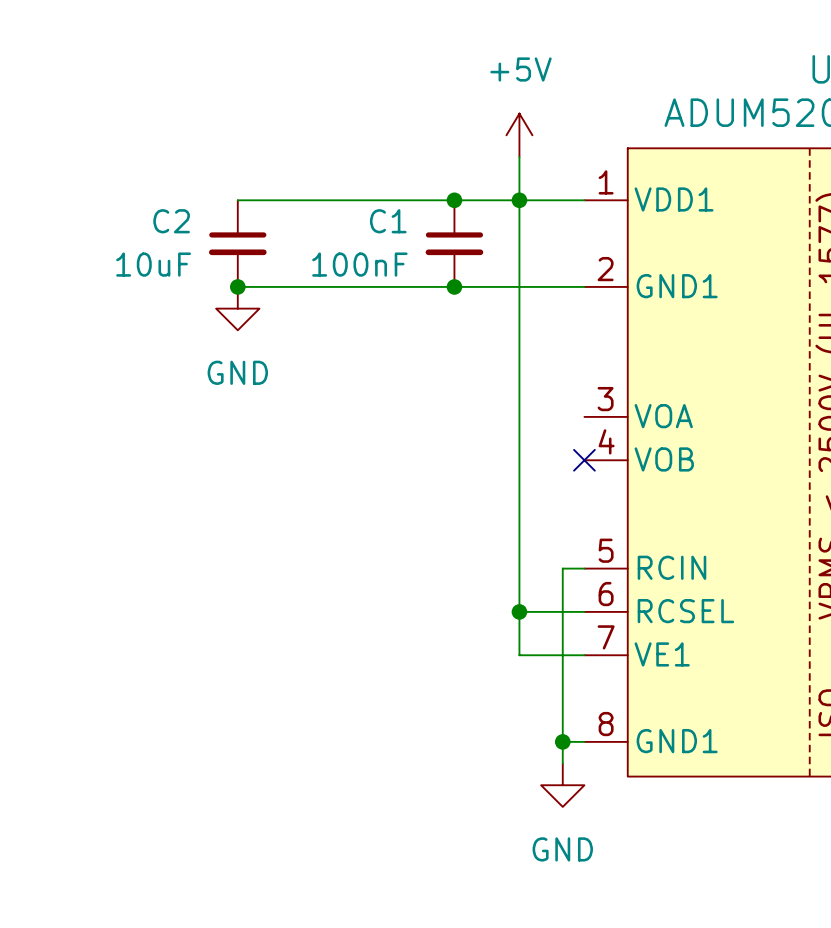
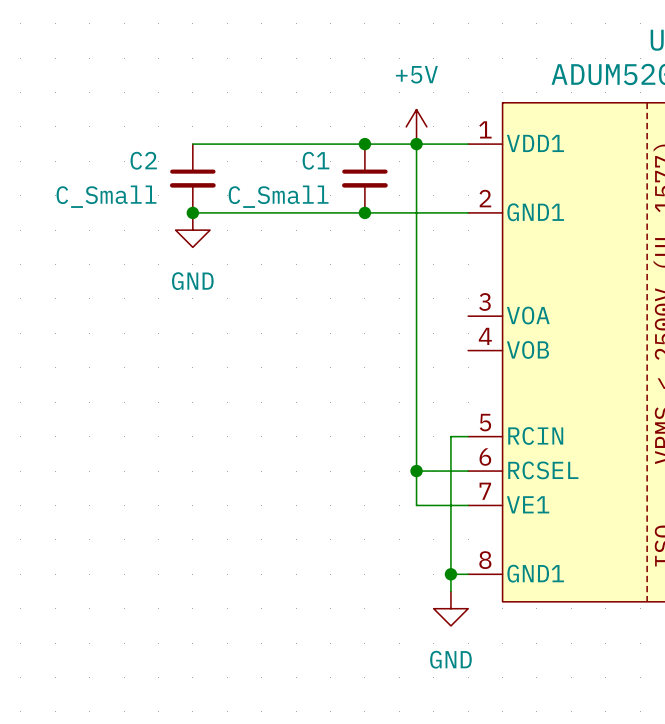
power symbol position: +5V (519, 135) -> +5V (416, 126)
C2 value: 10uF (153, 264) -> C_Small (106, 196)
C1 value: 100nF (359, 264) -> C_Small (278, 196)
no-connect mark: (584, 460) -> none

